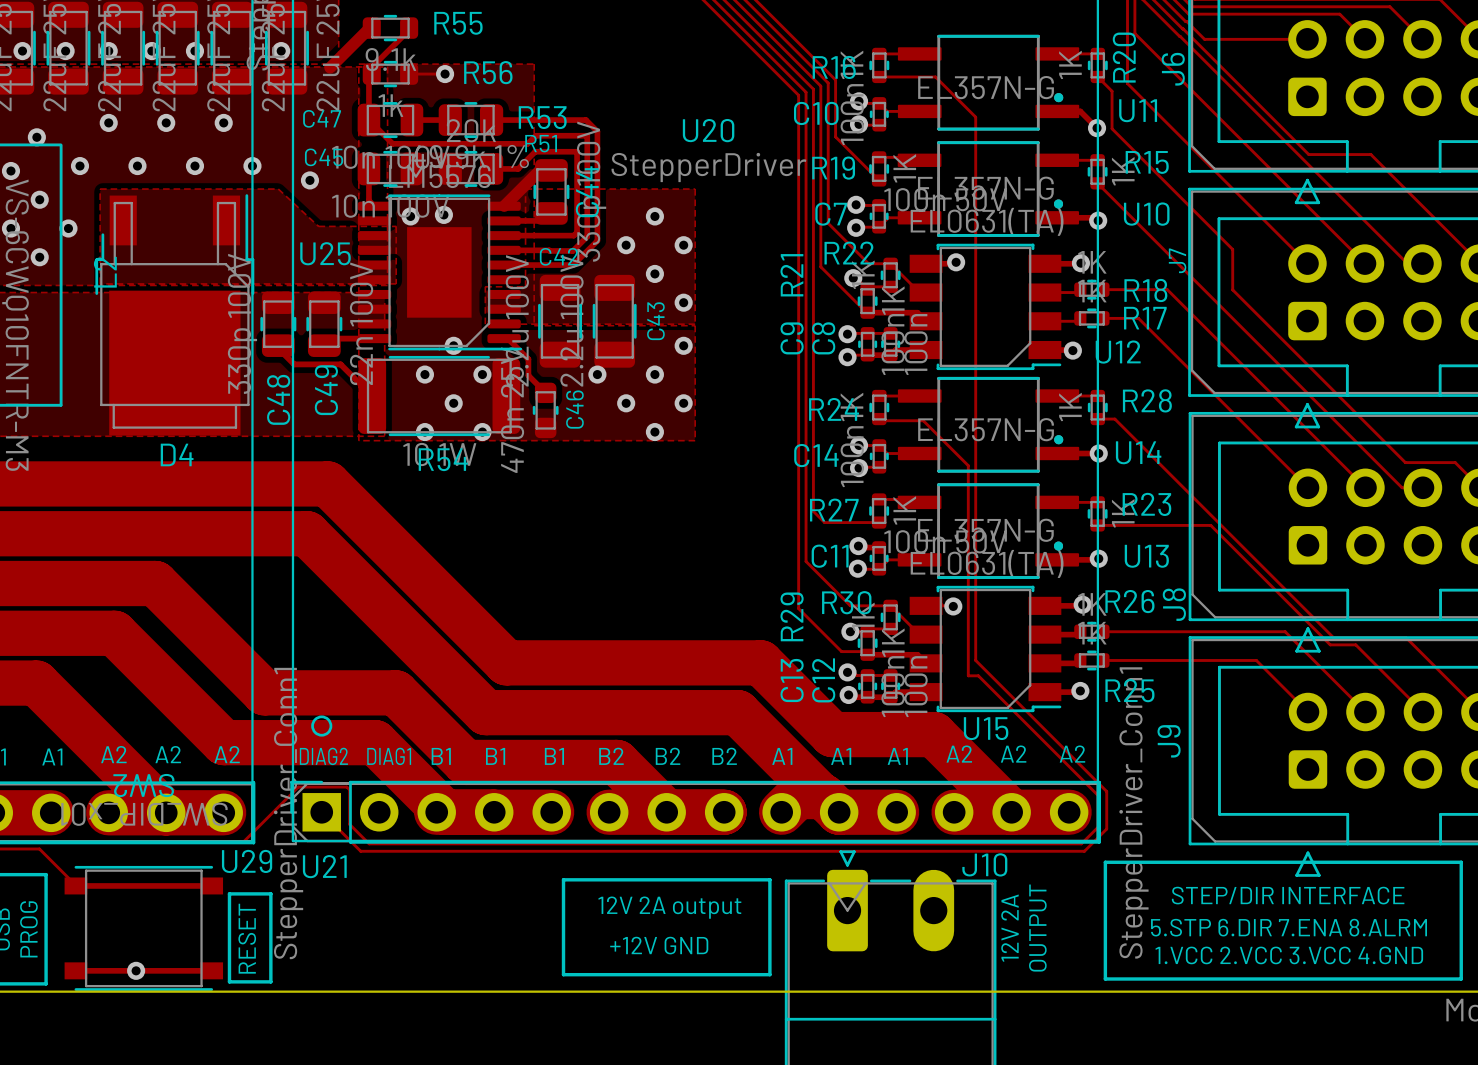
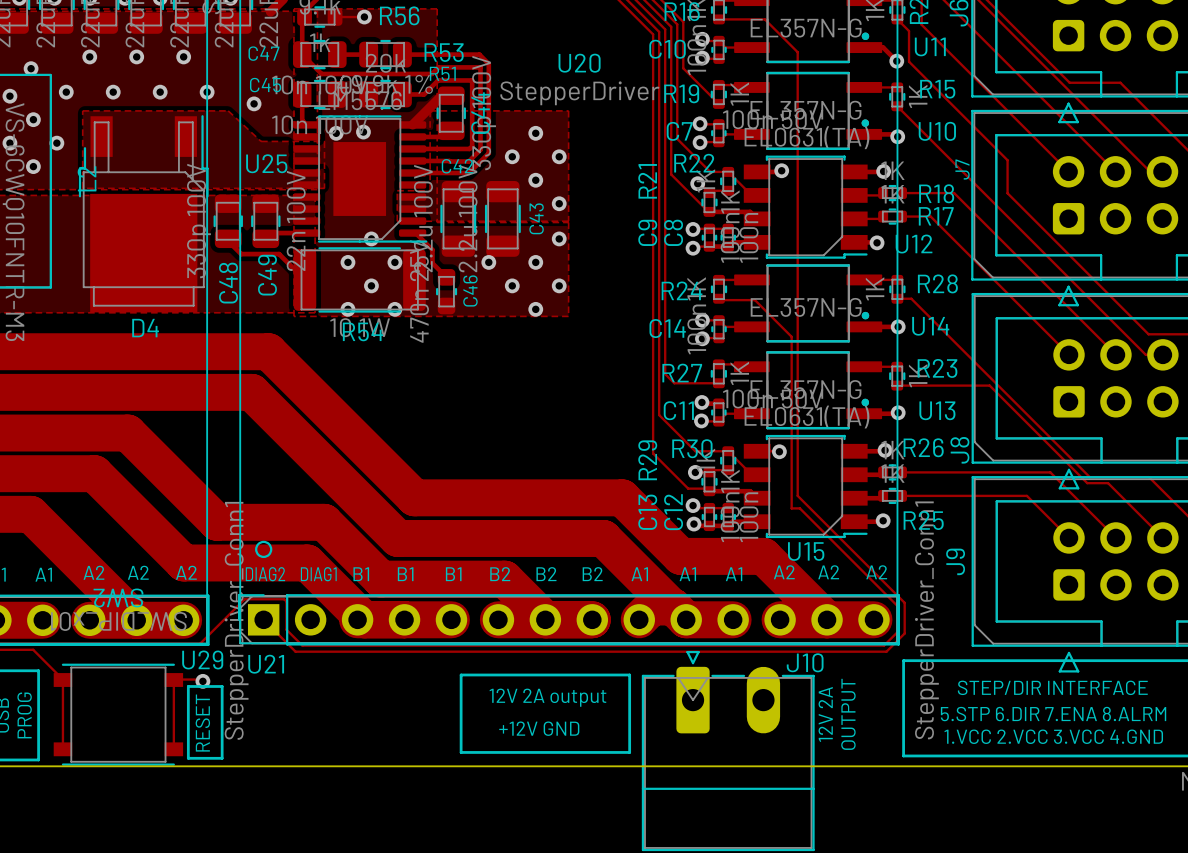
track: (75, 885) (211, 885) -> (62, 679) (62, 748)
via: none -> (202, 681)
track: (75, 970) (211, 970) -> (202, 681) (201, 679) (173, 679) (173, 748)
via: (136, 970) -> none

